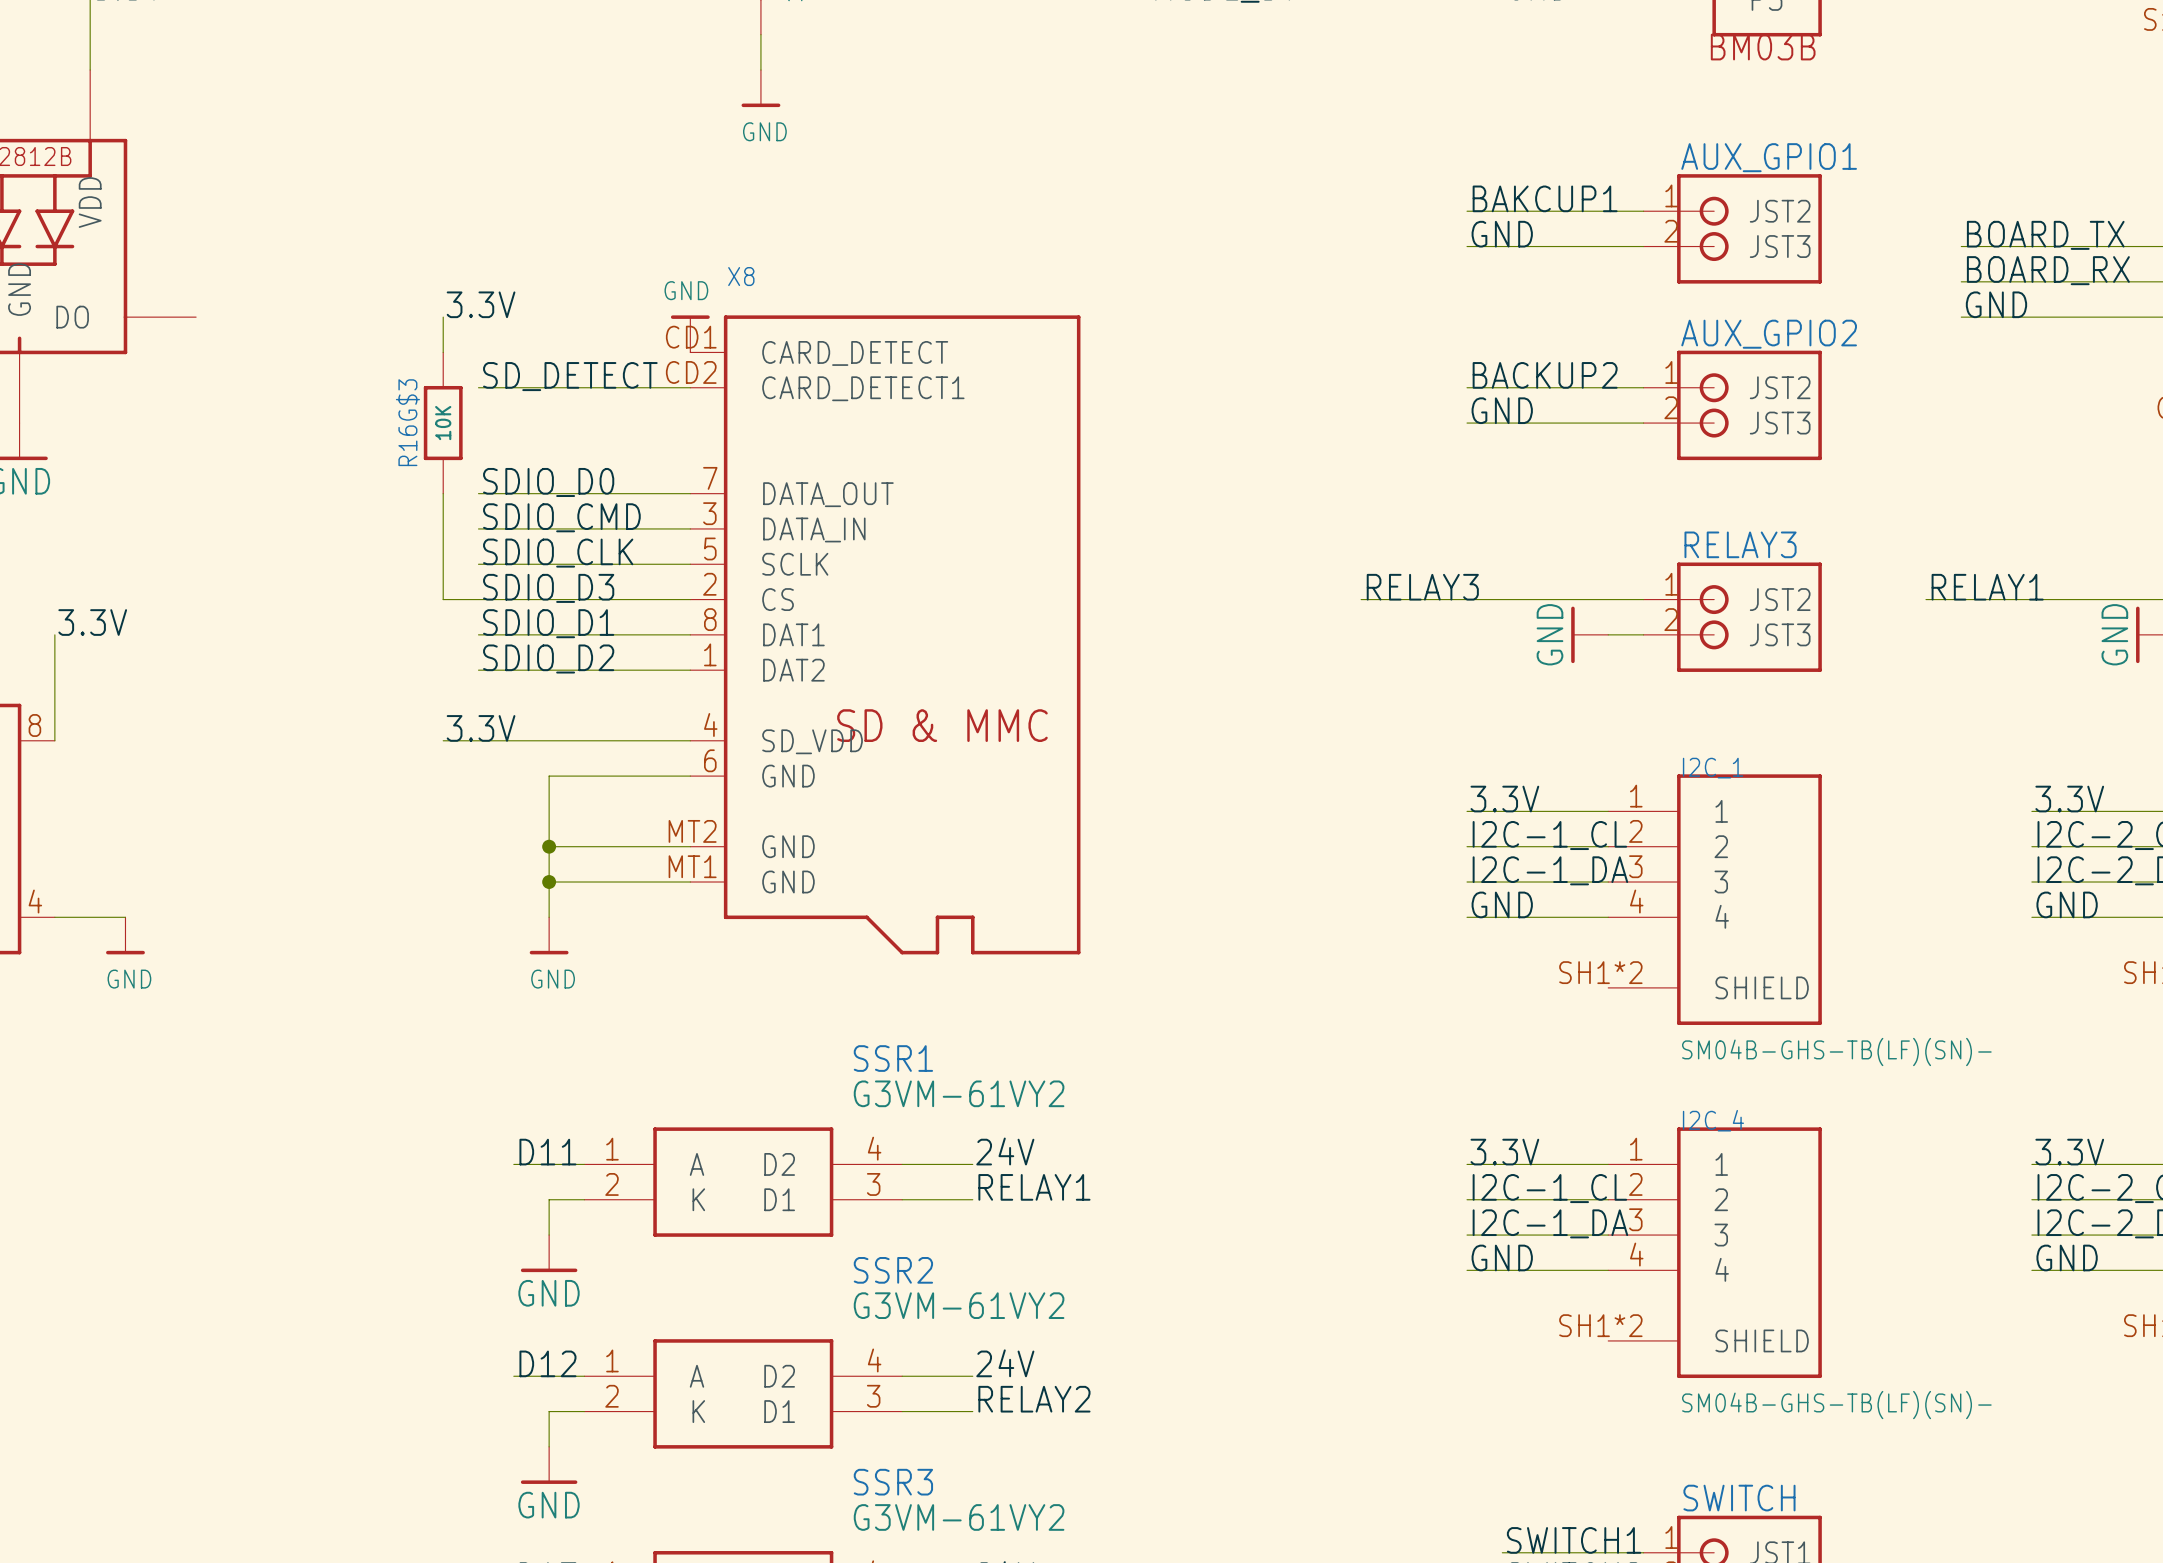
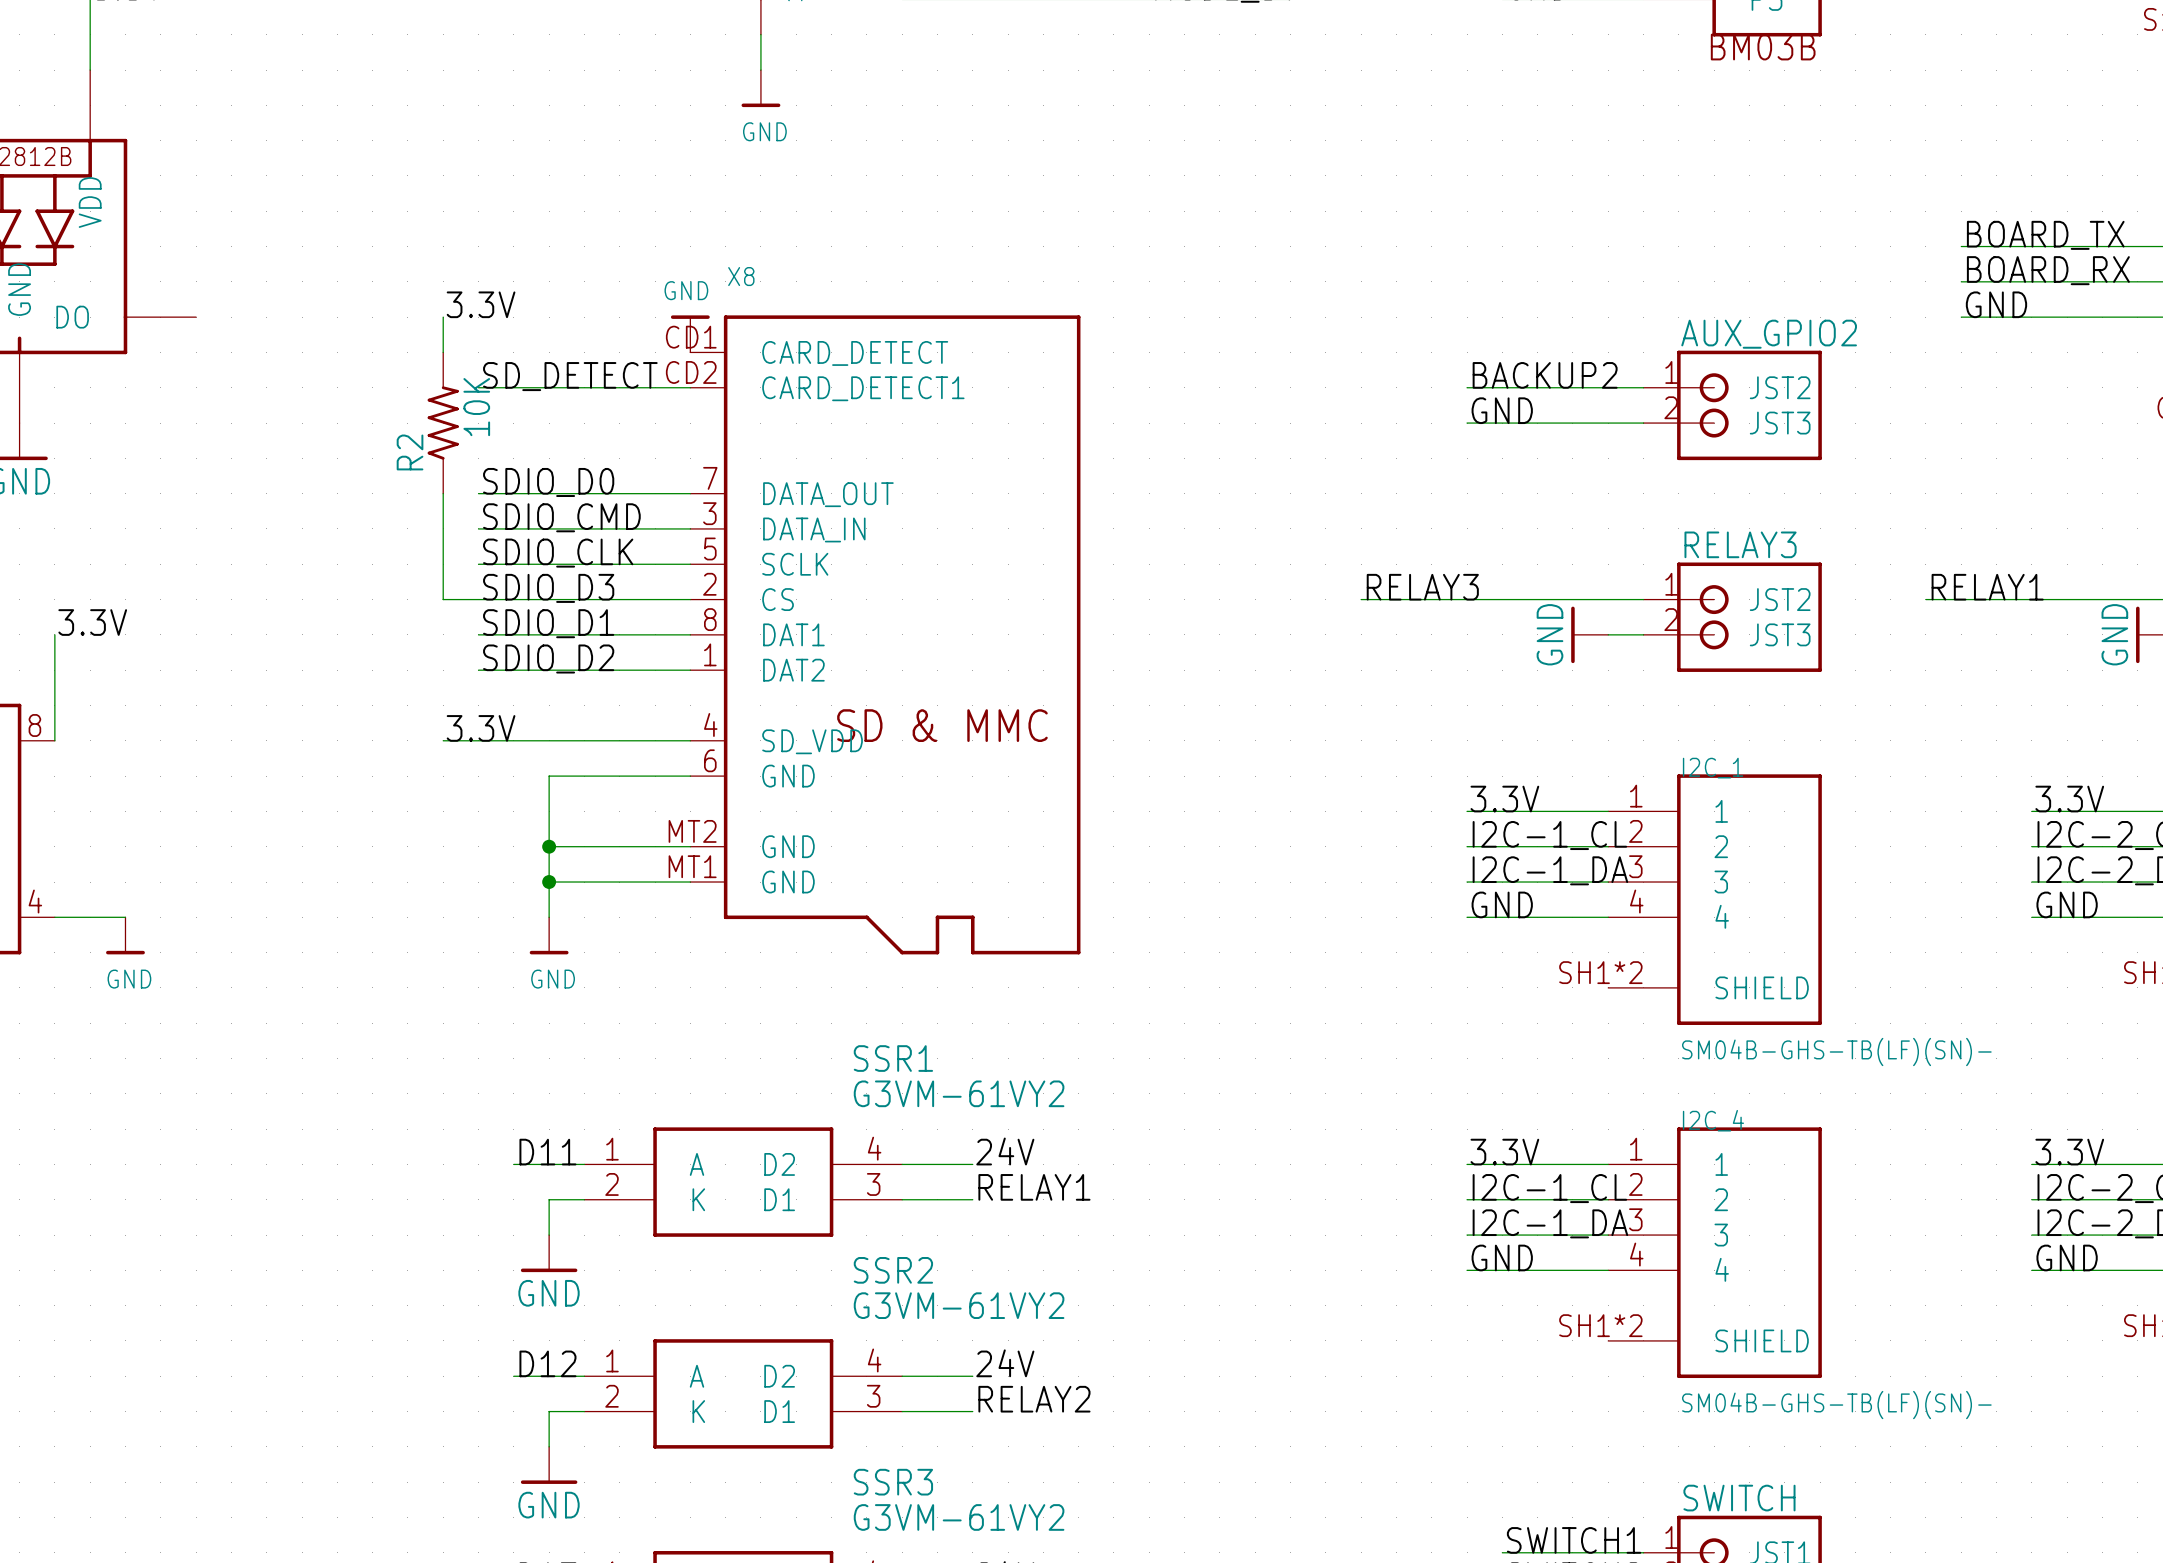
label: BAKCUP1 (1545, 198) -> none
wire: (1467, 211) (1643, 211) -> none
AUX_GPIO1: (1732, 228) -> none
label: GND (1502, 234) -> none
wire: (1467, 246) (1643, 246) -> none
R16G$3: 10K (443, 423) -> none
R2: none -> 10K (443, 423)

